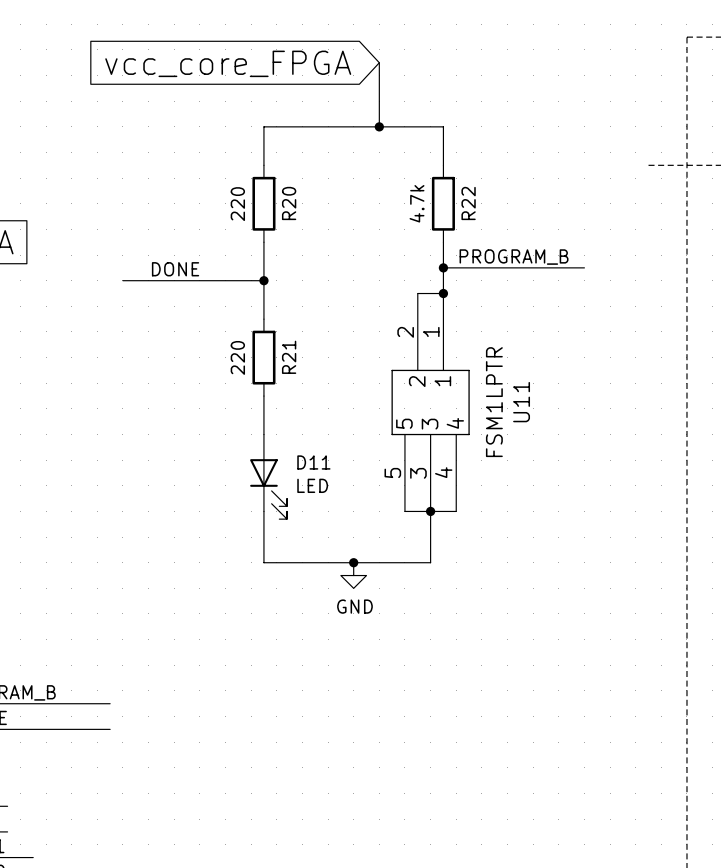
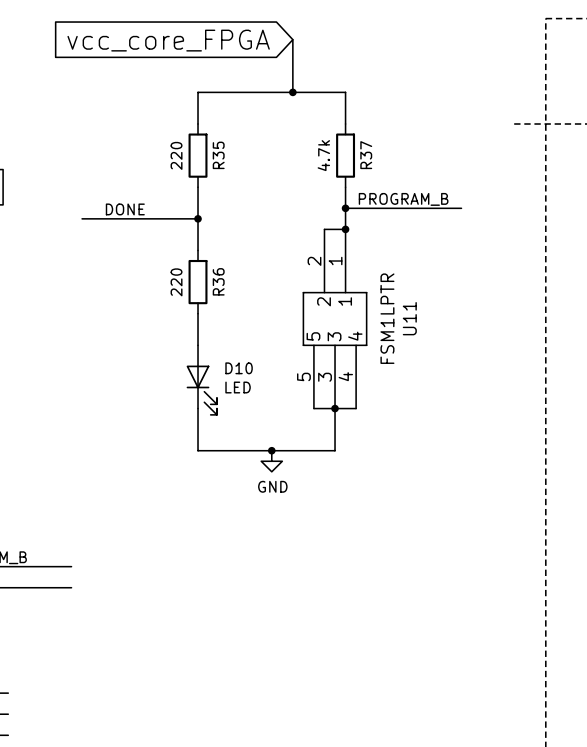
R20 name: R20 (289, 203) -> R35 (218, 155)
R22 name: R22 (468, 203) -> R37 (366, 155)
R21 name: R21 (289, 357) -> R36 (218, 281)
D11 name: D11 (313, 462) -> D10 (239, 368)

